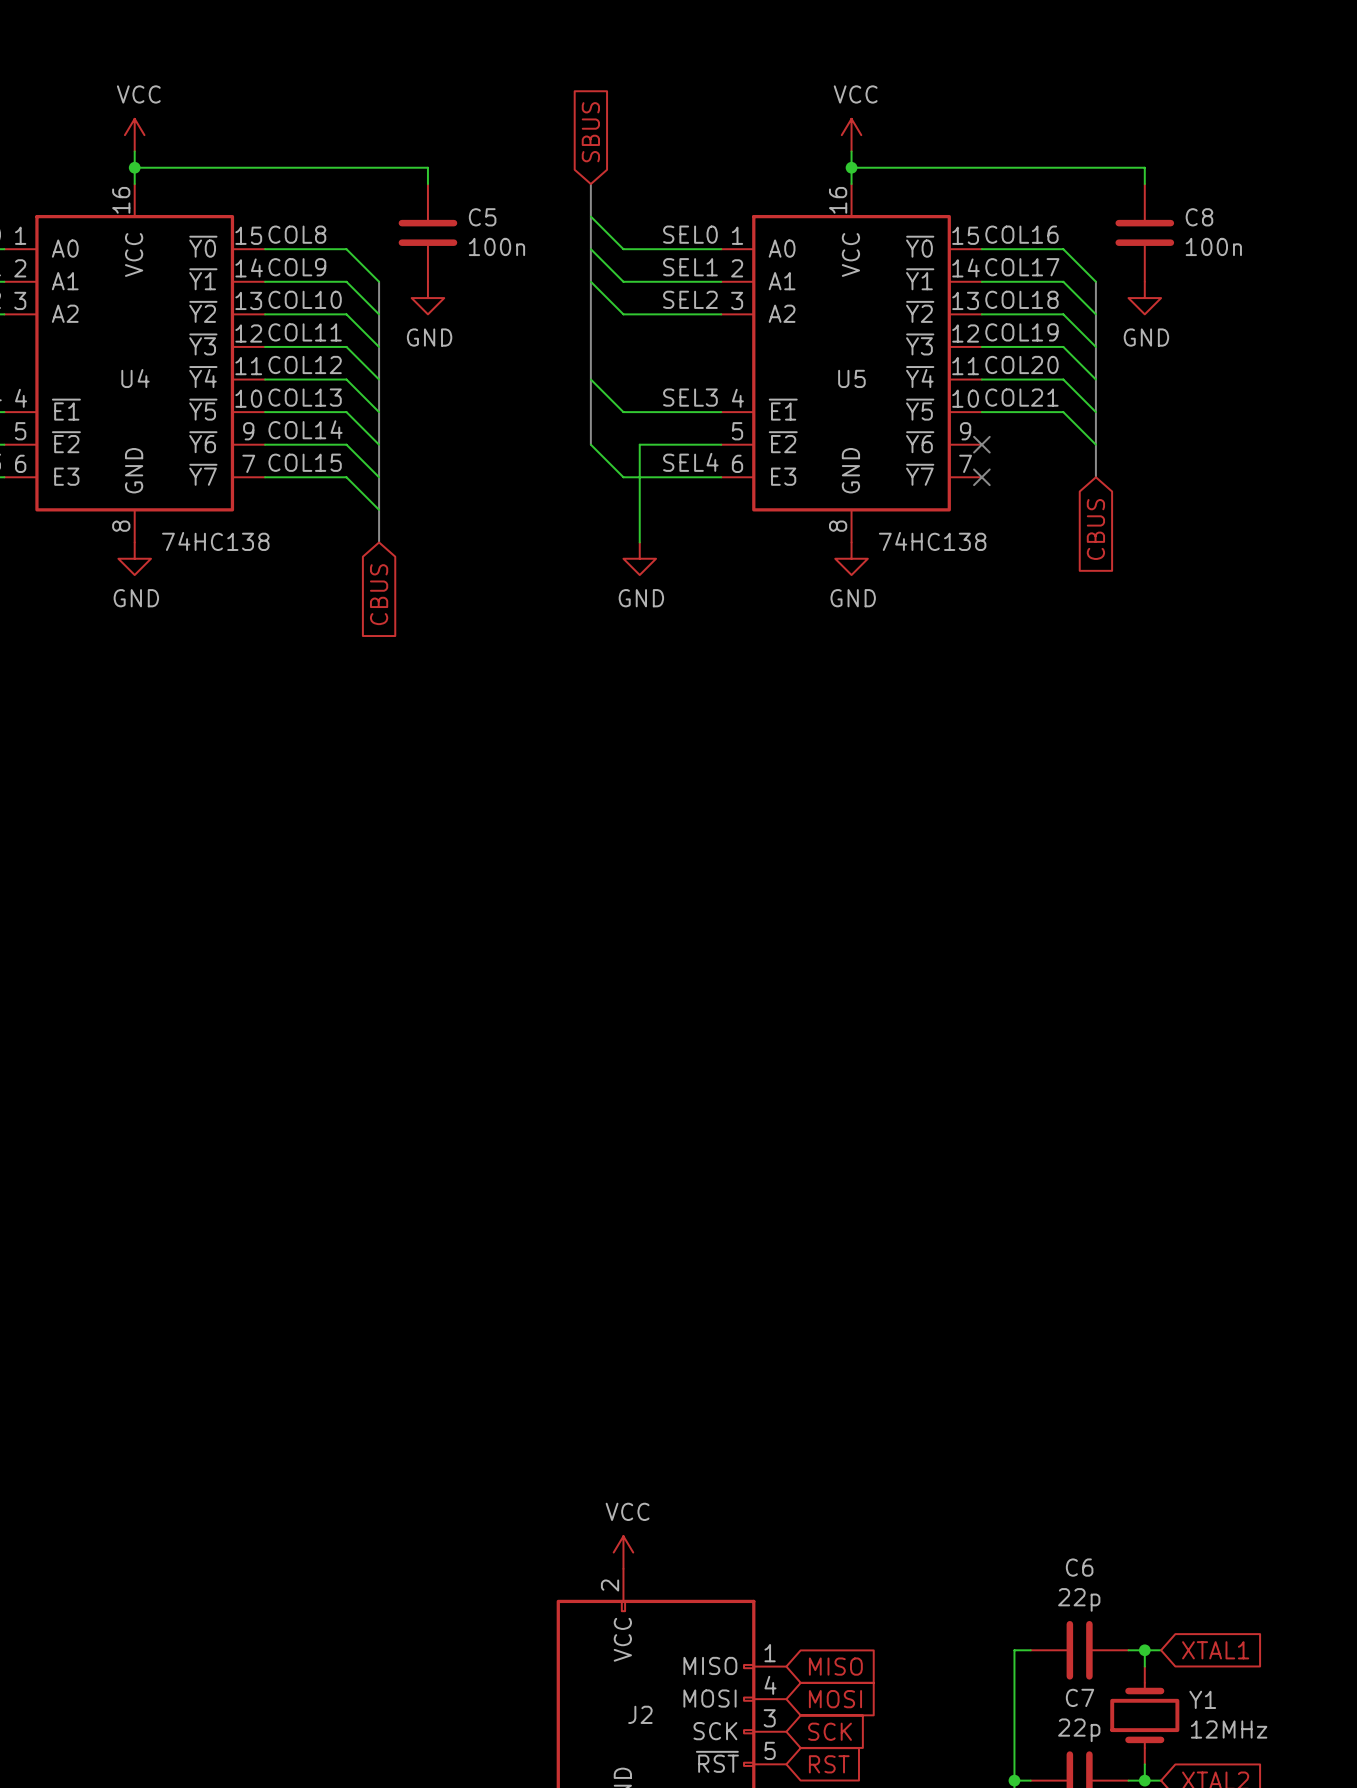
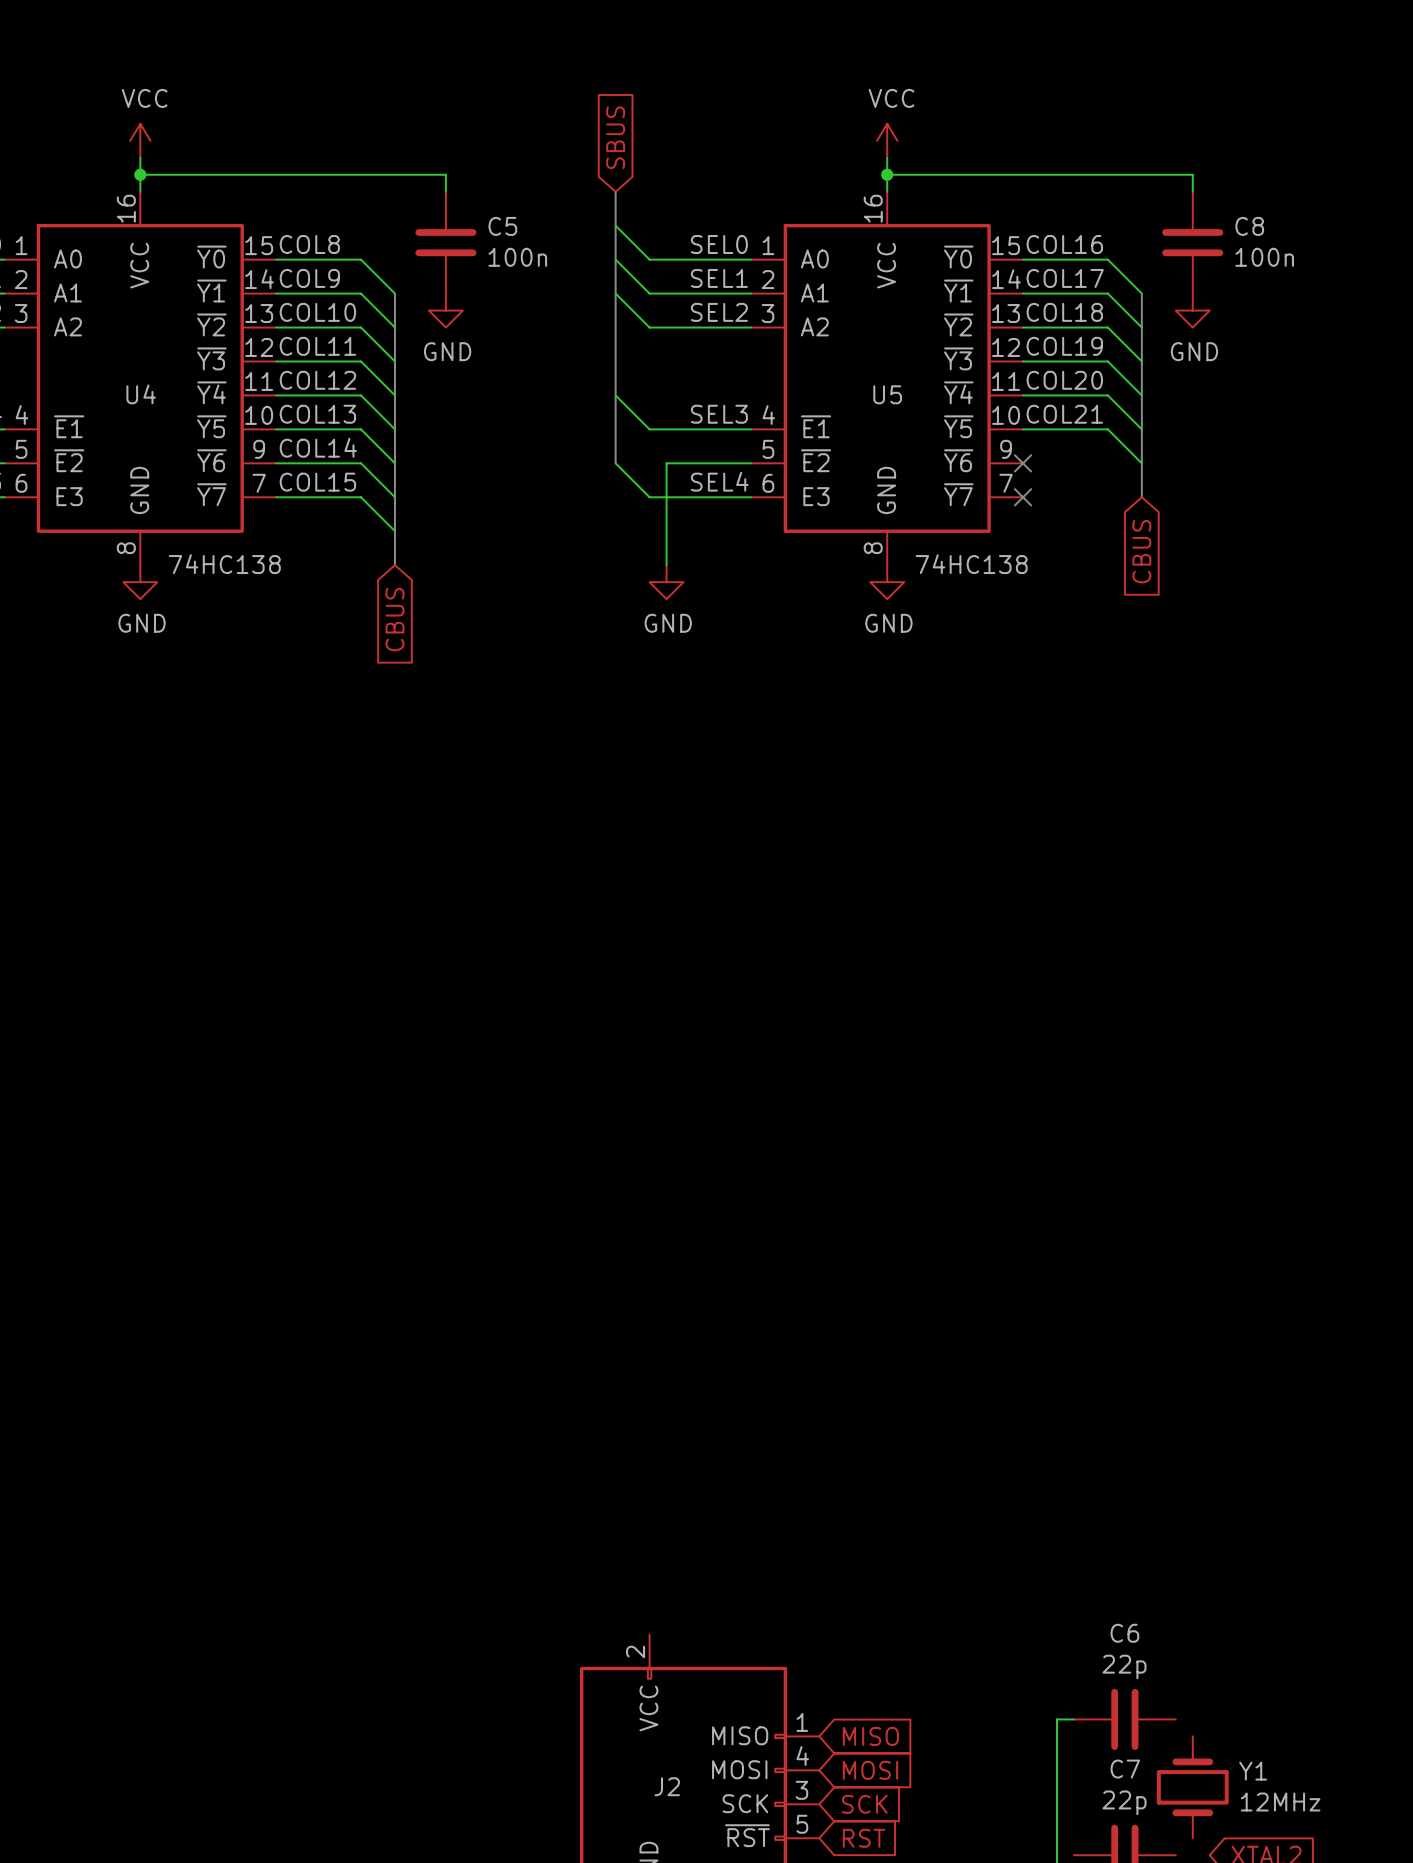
power symbol: VCC (623, 1552) -> none
wire: (1128, 1650) (1161, 1650) -> none
wire: (1144, 1650) (1144, 1666) -> none
junction: (1144, 1650) -> none
global label: XTAL1 (1215, 1650) -> none
wire: (1144, 1764) (1144, 1780) -> none
wire: (1014, 1780) (1030, 1780) -> none
junction: (1014, 1780) -> none
wire: (1128, 1780) (1161, 1780) -> none
junction: (1144, 1780) -> none

